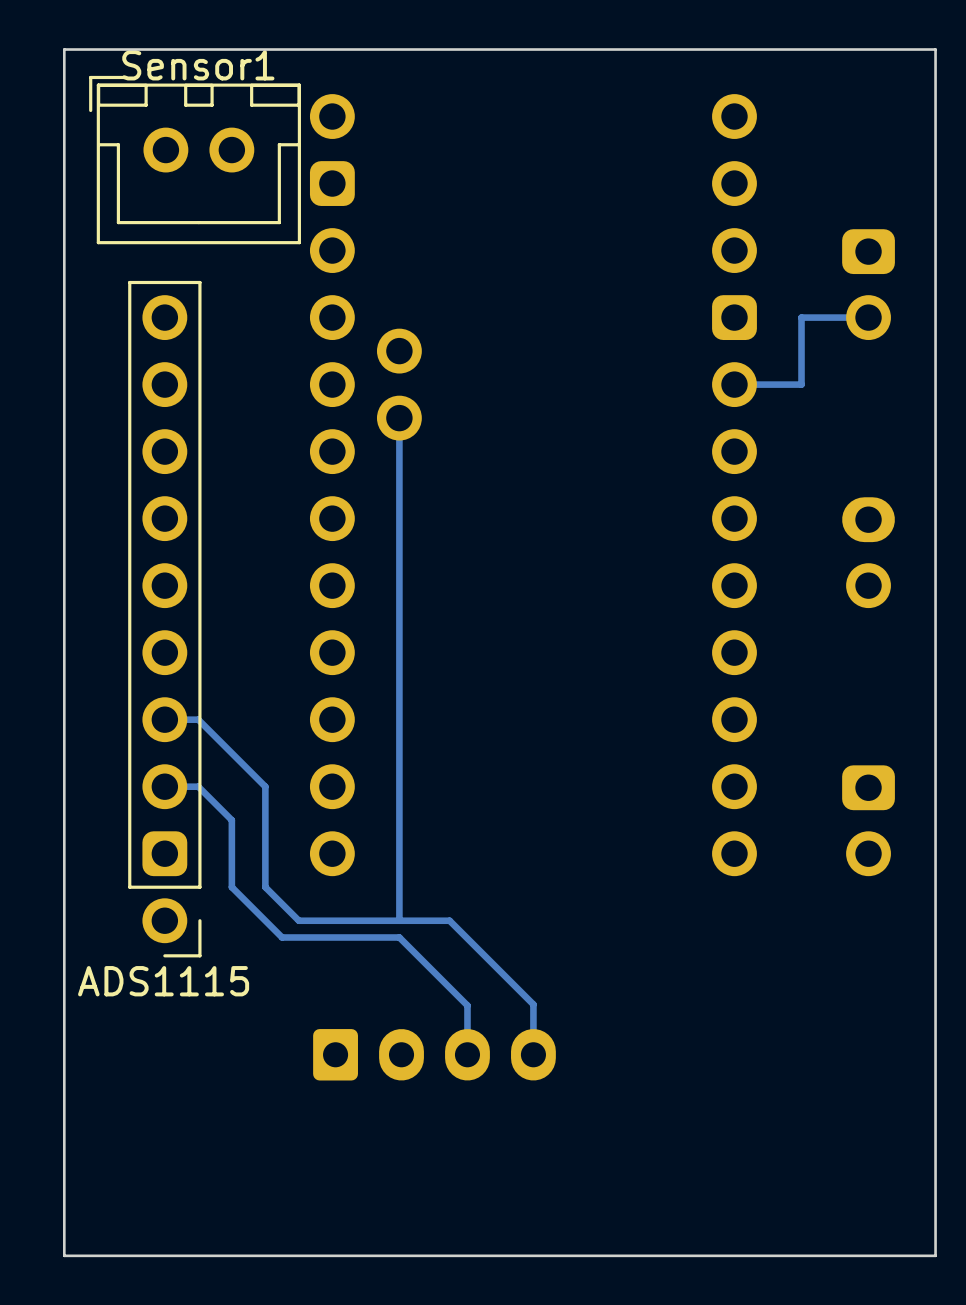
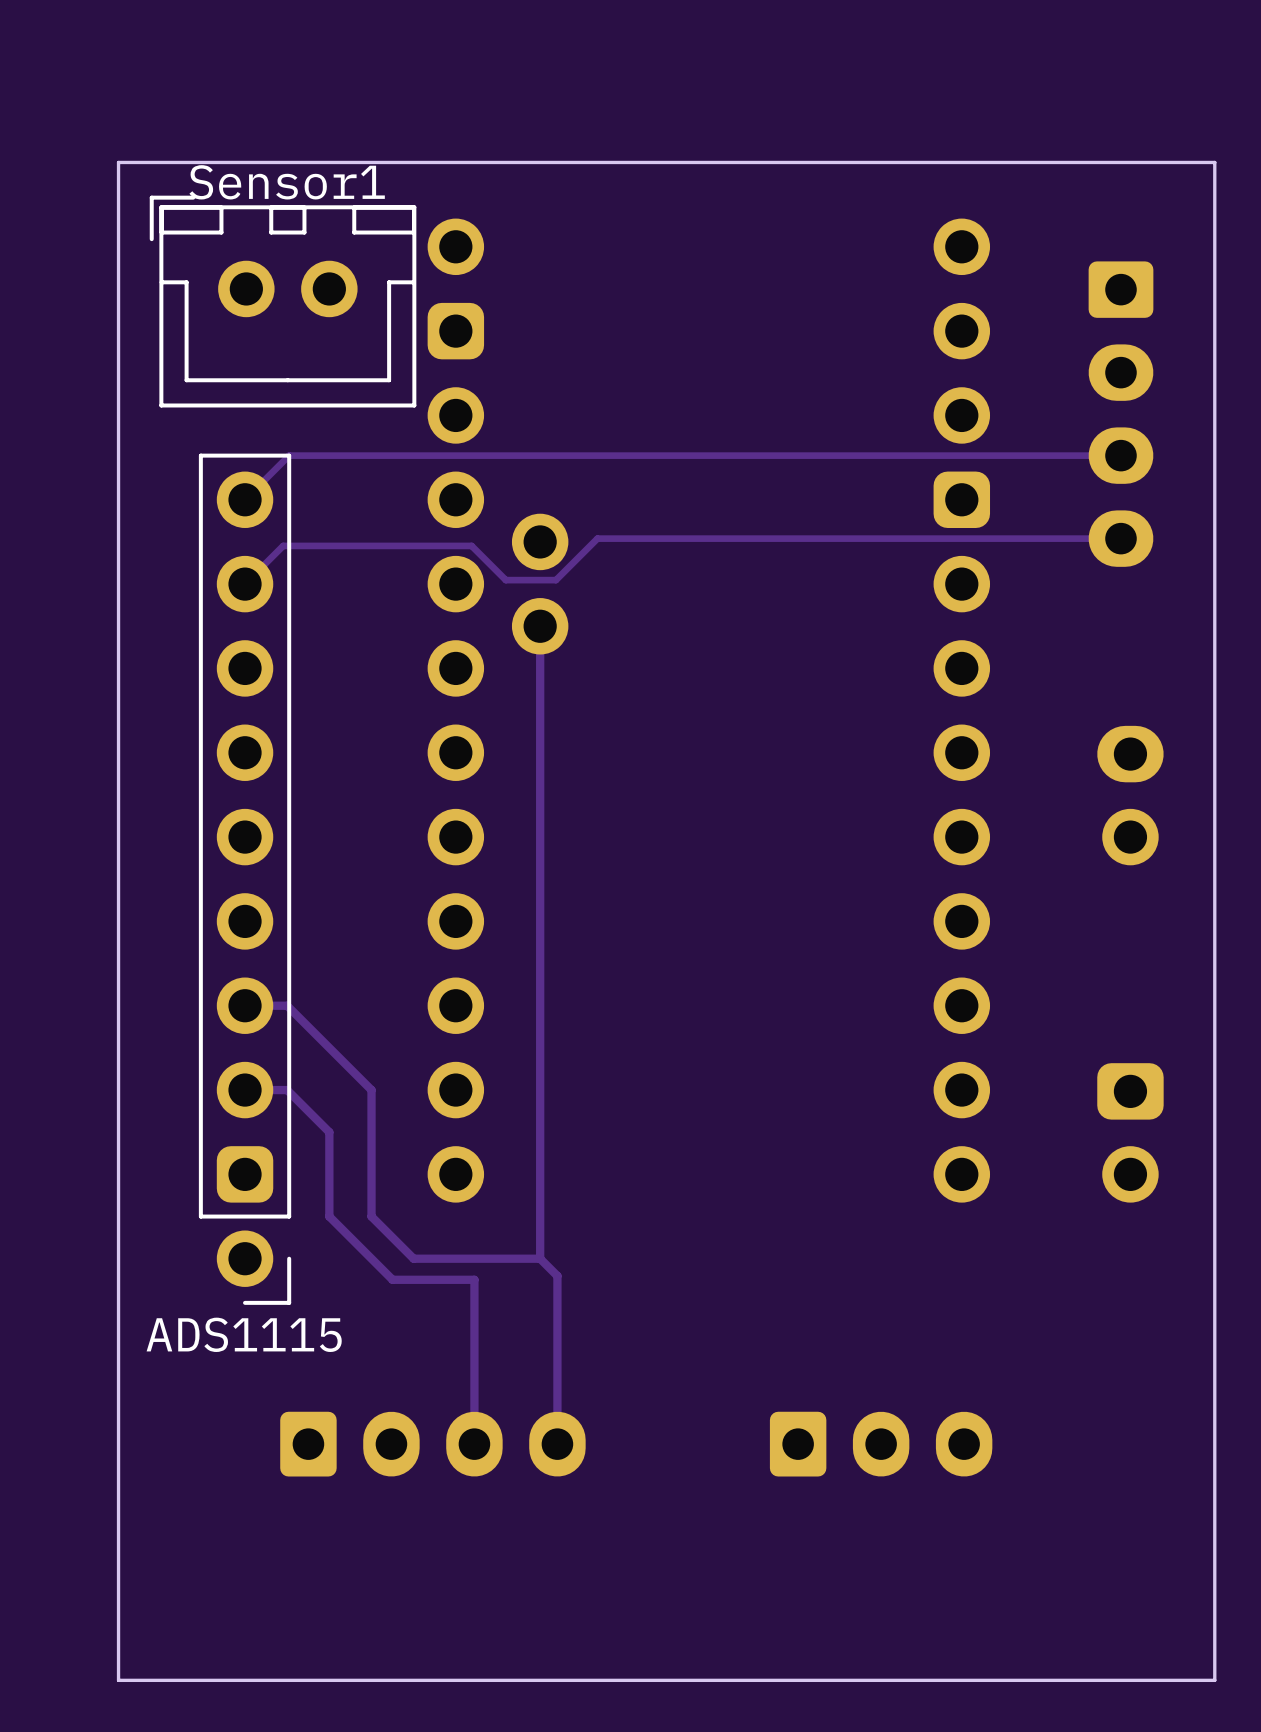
part: none -> (1120, 414)
track: none -> (1120, 455) (289, 455) (245, 499)
part: (868, 284) -> none
track: (868, 317) (801, 317) (801, 384) (734, 384) -> none
track: none -> (1120, 538) (597, 538) (555, 580) (505, 580) (471, 545) (283, 545) (245, 584)
track: (399, 920) (449, 920) (533, 1004) (533, 1054) -> (540, 1258) (557, 1275) (557, 1426)
track: (347, 937) (399, 937) (467, 1005) (467, 1054) -> (474, 1279) (474, 1426)
part position: (434, 1054) -> (432, 1444)
part: none -> (881, 1444)

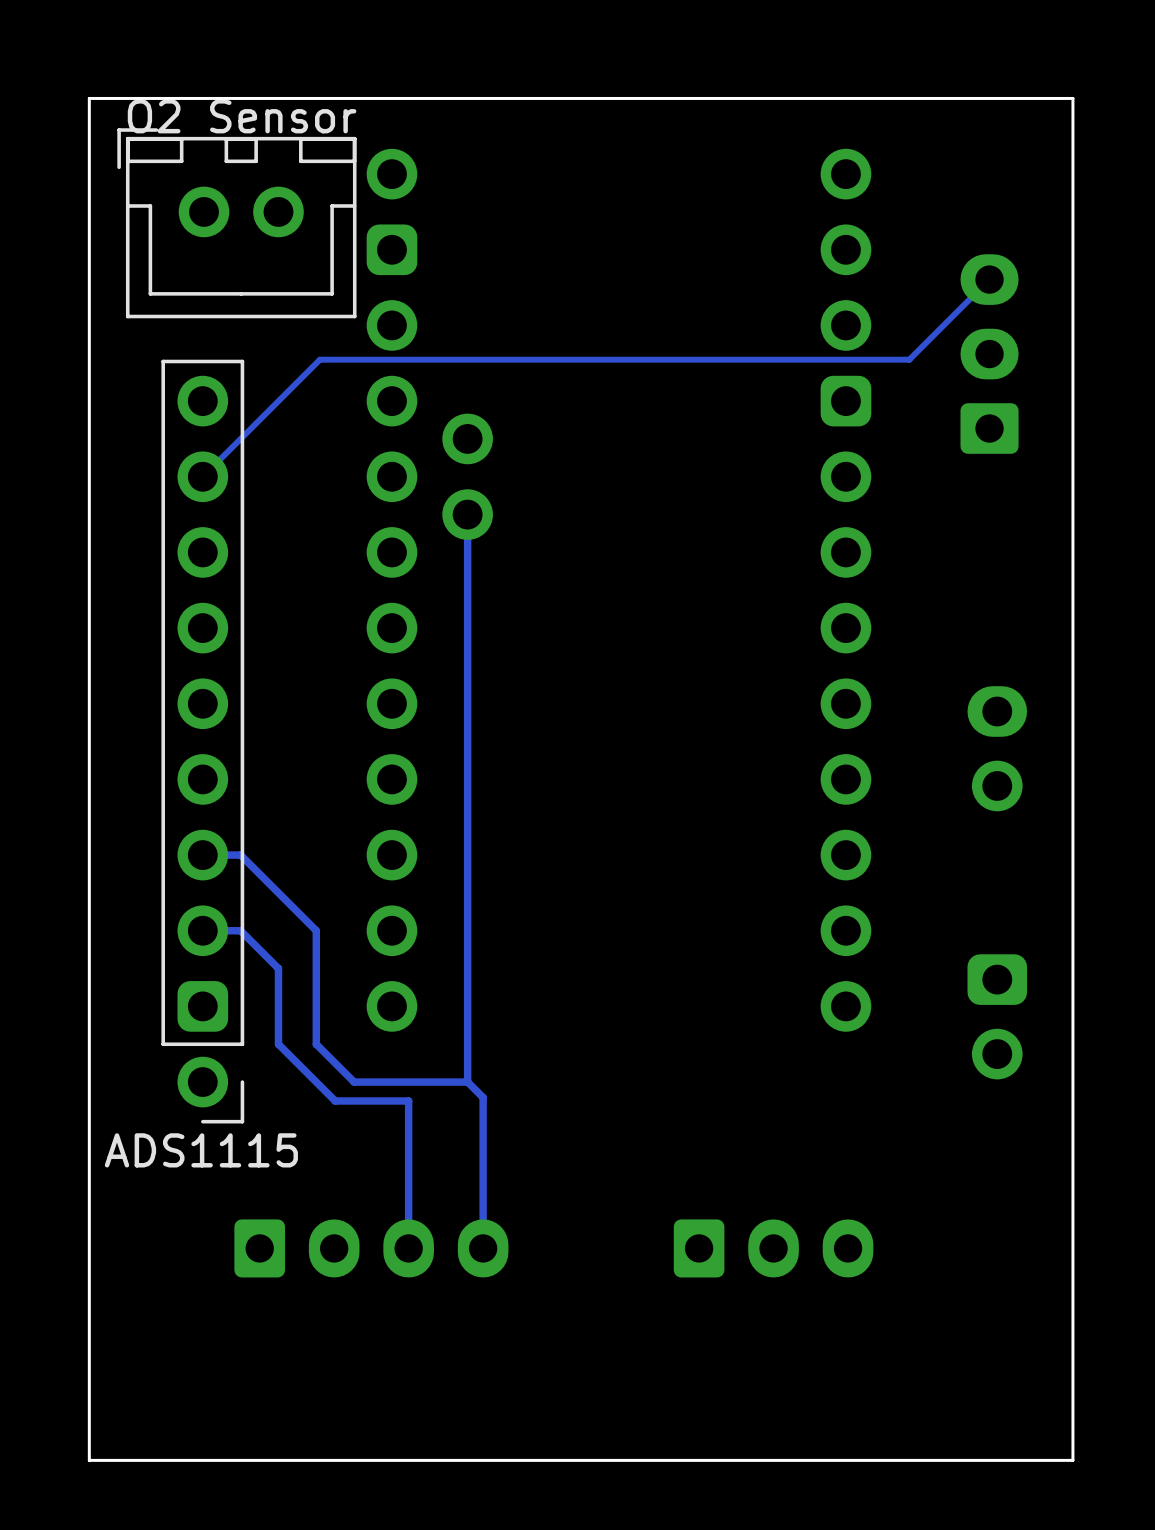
Sensor1 name: Sensor1 (287, 182) -> O2 Sensor (242, 116)
part: (1120, 414) -> none
part: none -> (989, 354)
track: (1120, 455) (289, 455) (245, 499) -> none
track: (1120, 538) (597, 538) (555, 580) (505, 580) (471, 545) (283, 545) -> (989, 279) (909, 359) (319, 359) (237, 442)
part position: (1130, 795) -> (997, 748)
part position: (1130, 1132) -> (997, 1016)

